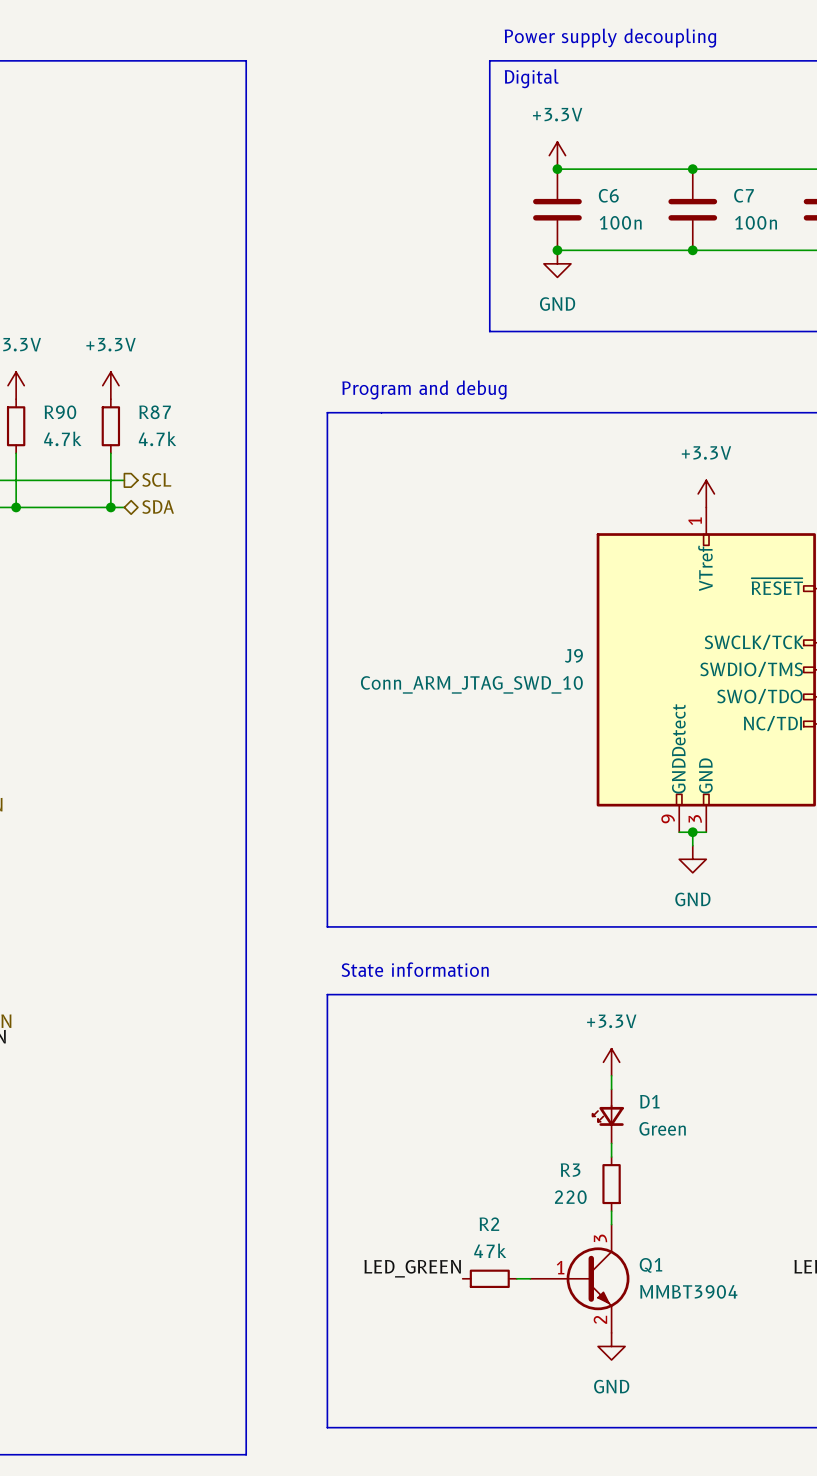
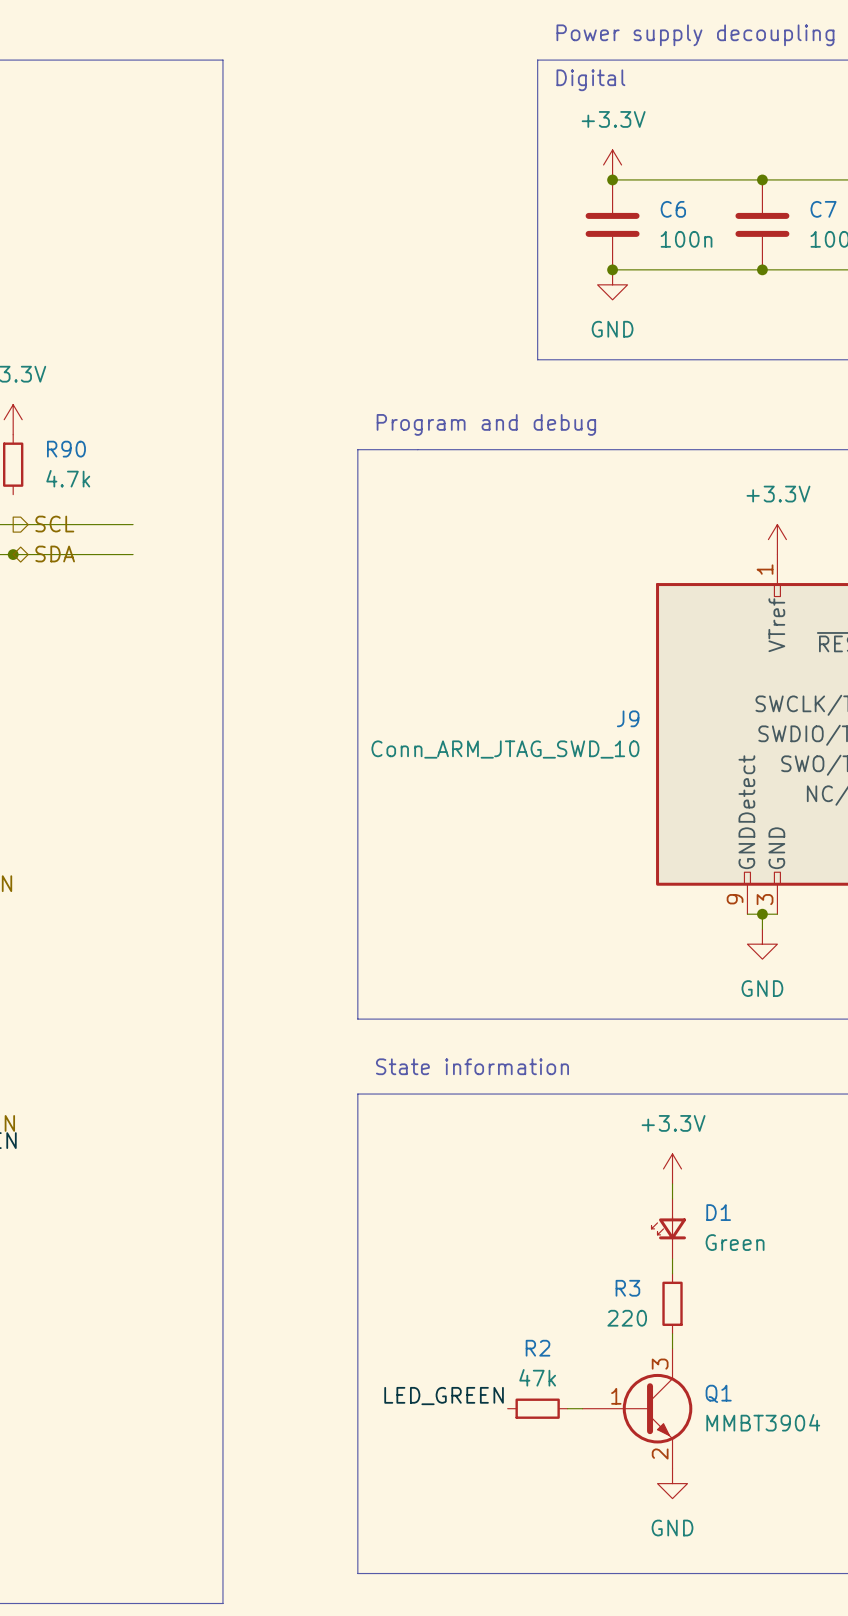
line: (205, 60) (246, 60) (246, 1454) (205, 1454) -> (222, 60) (222, 1603)
power symbol: +3.3V (110, 385) -> none
R87: 4.7k (110, 426) -> none
wire: (16, 453) (16, 507) -> none
wire: (110, 453) (110, 507) -> none
hierarchical label position: SCL (156, 479) -> SCL (54, 524)
junction: (110, 507) -> none
hierarchical label position: SDA (158, 507) -> SDA (55, 554)

